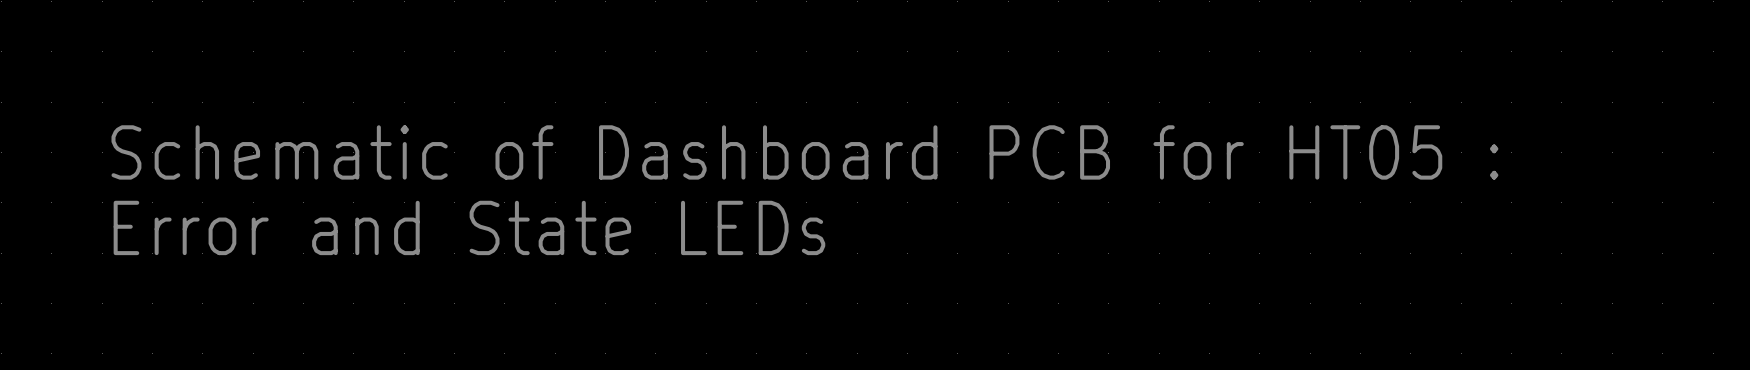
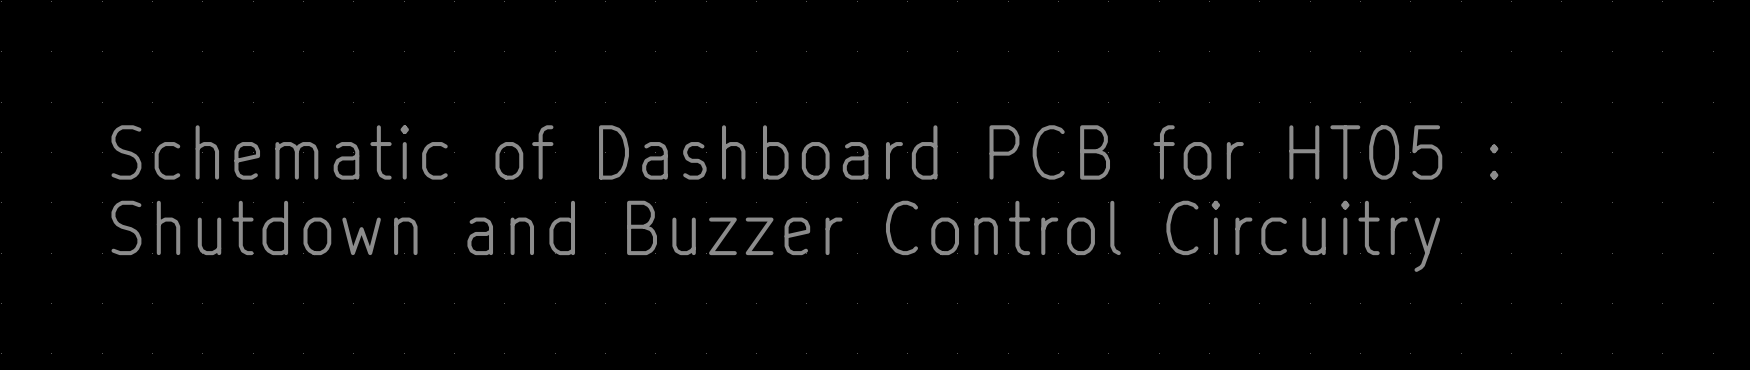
text: Error and State LEDs (469, 227) -> Shutdown and Buzzer Control Circuitry (775, 236)

